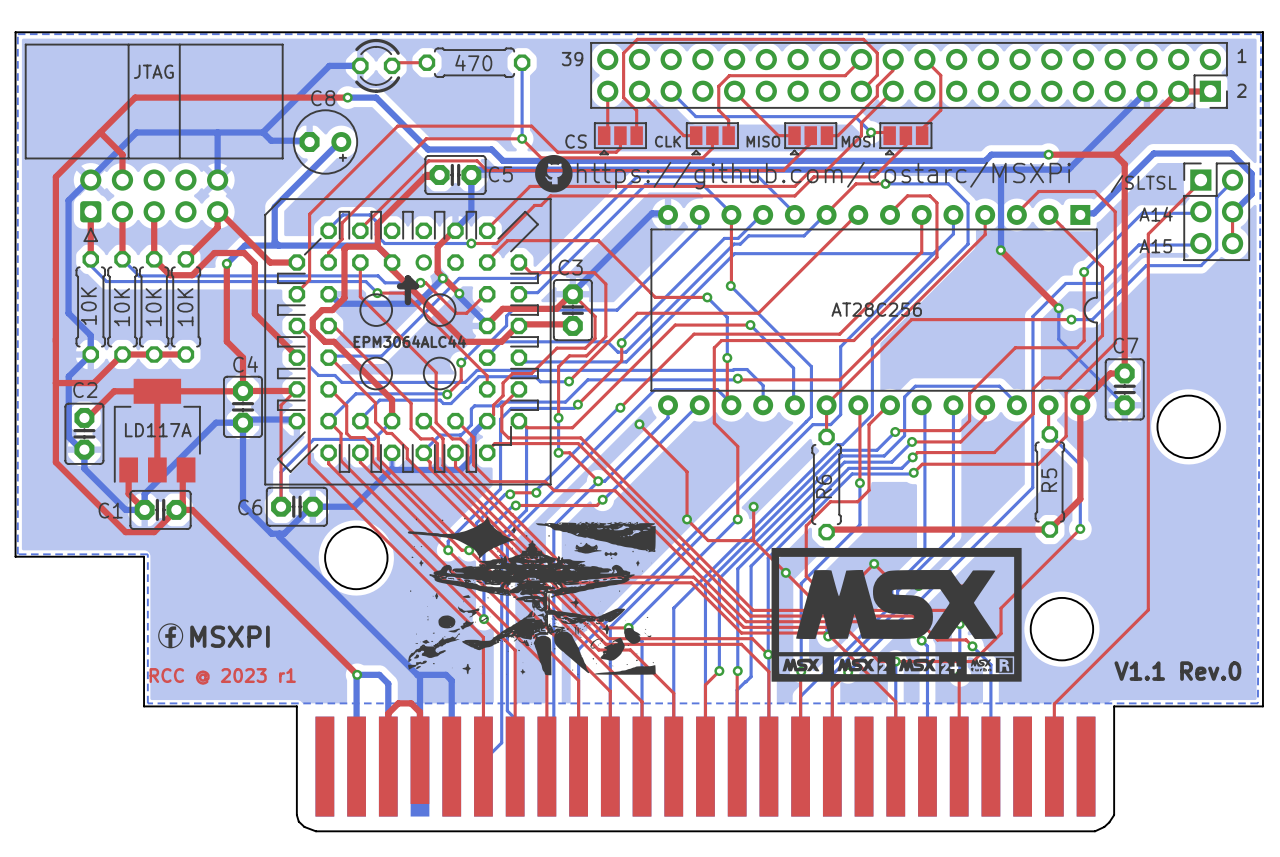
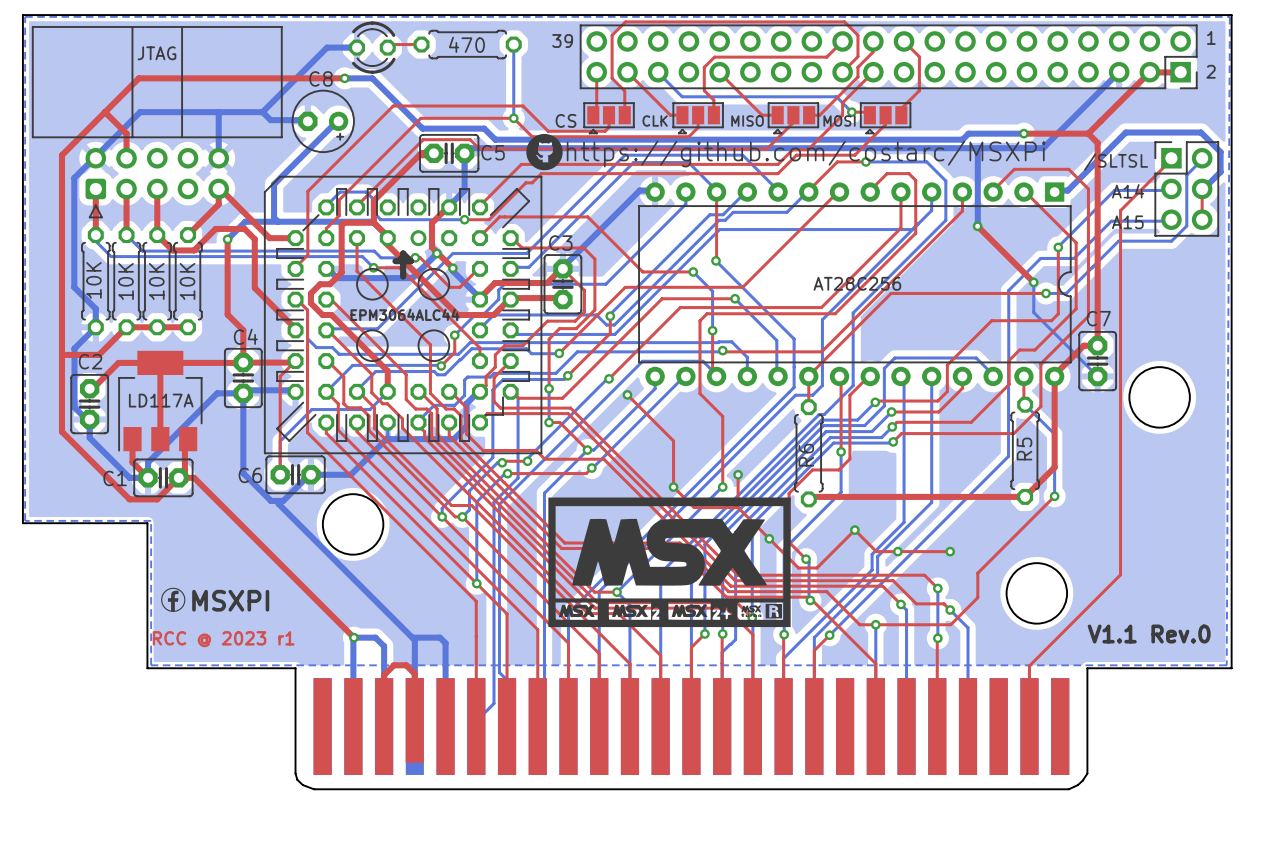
drawing: [407, 516, 656, 676] -> none
drawing position: (896, 614) -> (669, 562)

